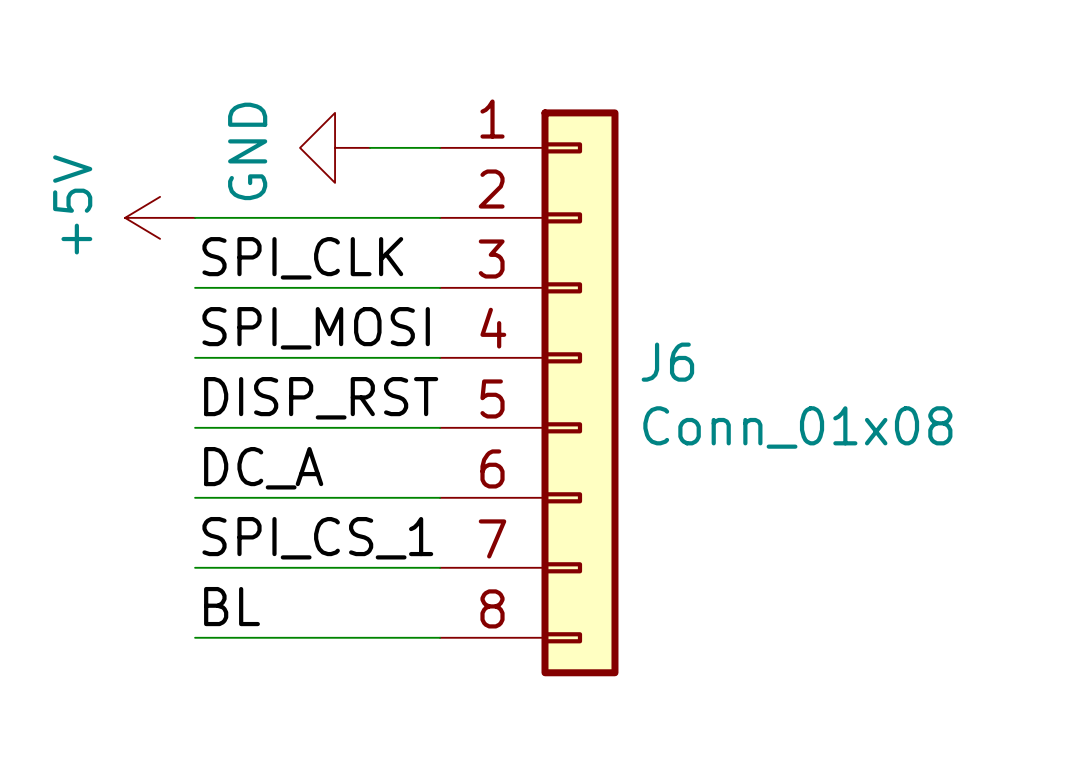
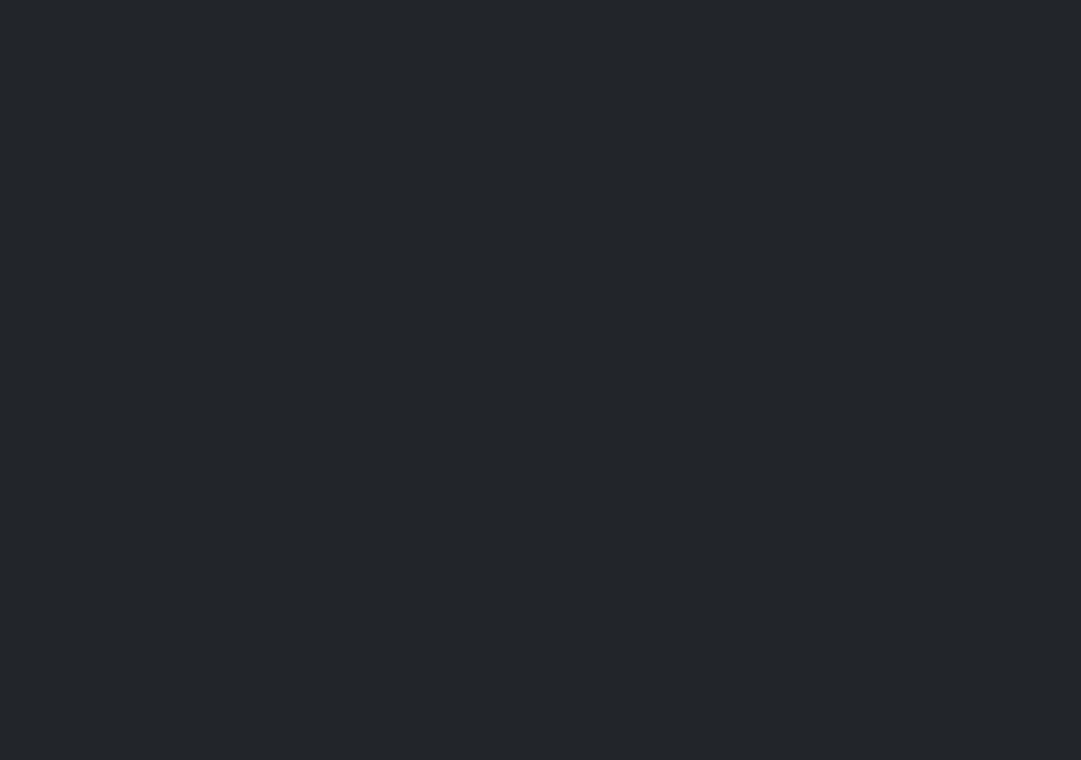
power symbol: GND (335, 147) -> none
wire: (370, 147) (440, 147) -> none
power symbol: +5V (160, 217) -> none
wire: (195, 217) (440, 217) -> none
label: SPI_CLK (302, 258) -> none
wire: (195, 287) (440, 287) -> none
label: SPI_MOSI (316, 328) -> none
wire: (195, 357) (440, 357) -> none
J6: Conn_01x08 (529, 392) -> none
label: DISP_RST (321, 398) -> none
wire: (195, 427) (440, 427) -> none
label: DC_A (263, 468) -> none
wire: (195, 497) (440, 497) -> none
label: SPI_CS_1 (317, 538) -> none
wire: (195, 567) (440, 567) -> none
label: BL (231, 606) -> none
wire: (195, 637) (440, 637) -> none

